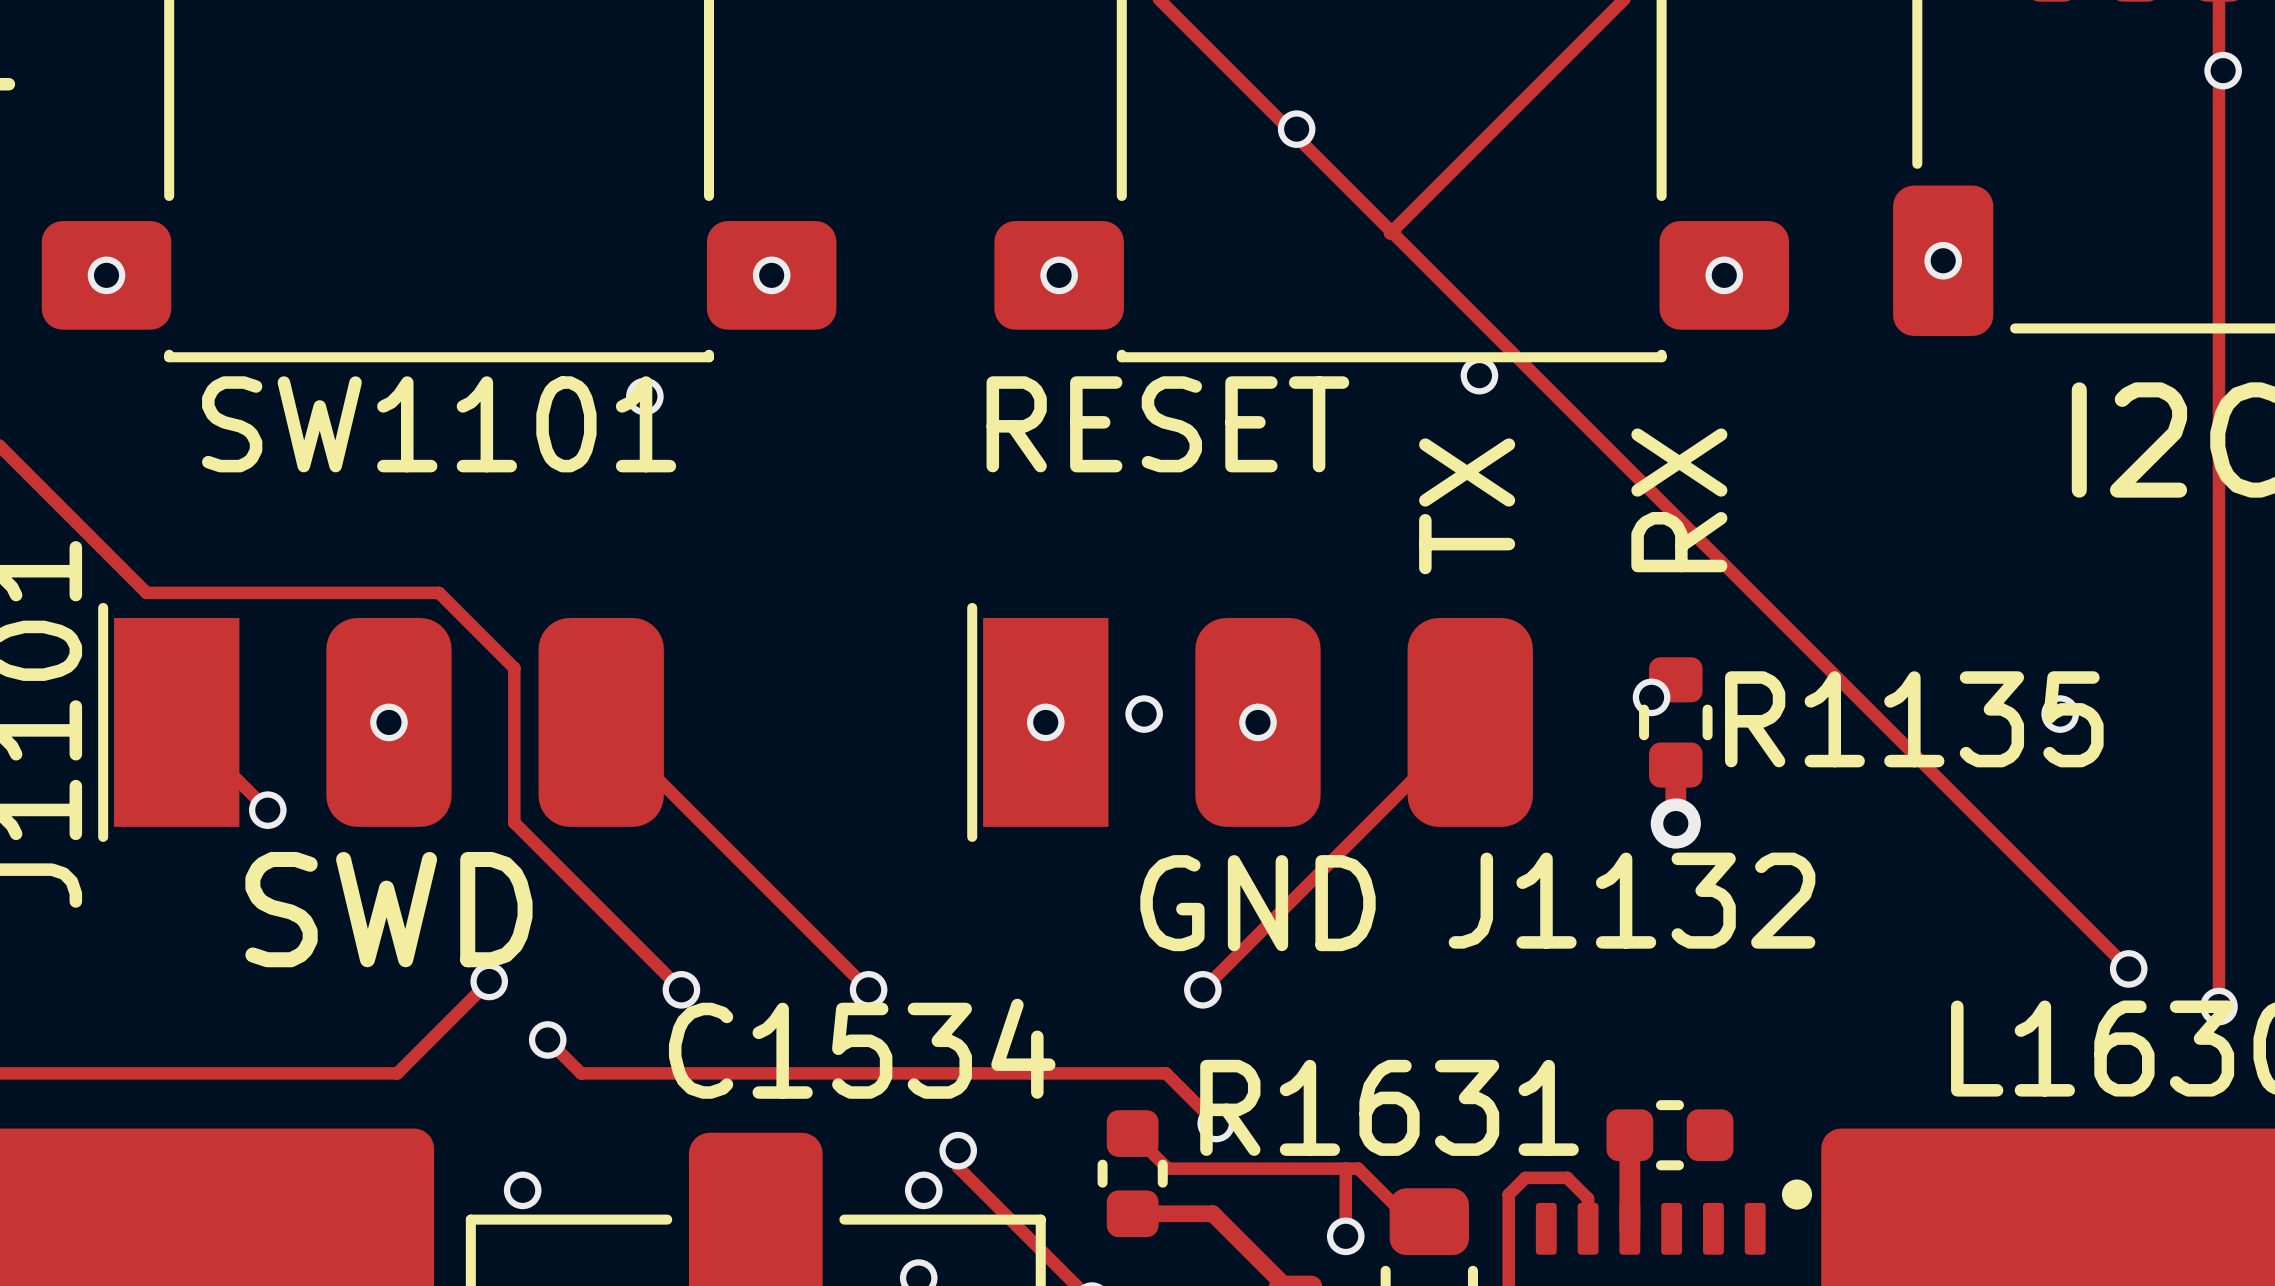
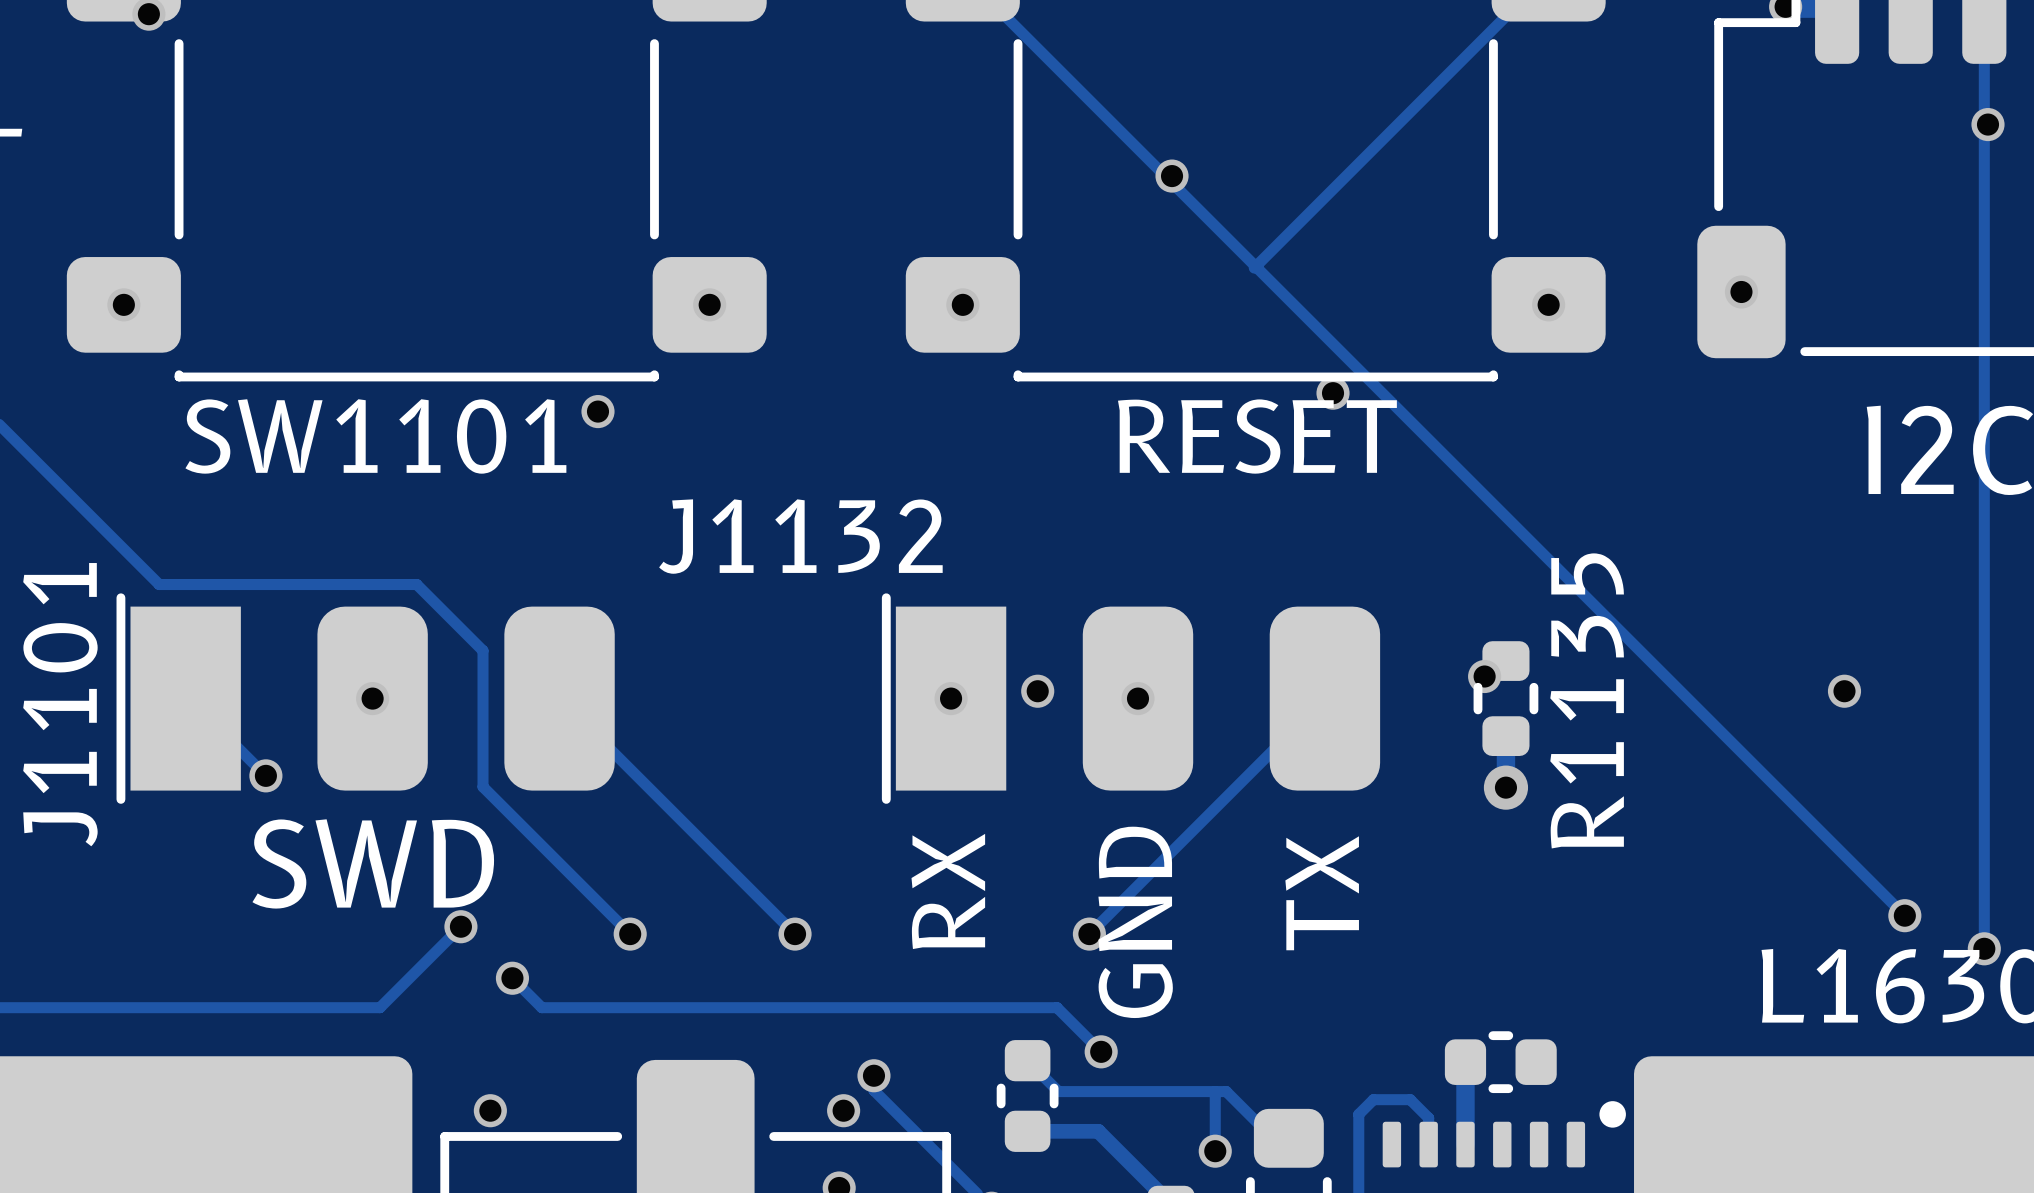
SW1101 name position: SW1101 (439, 424) -> SW1101 (375, 436)
text position: RESET (1167, 424) -> RESET (1257, 436)
text position: RX (1679, 500) -> RX (948, 891)
text position: TX (1467, 506) -> TX (1322, 893)
R1135 name rotation: 0° (1914, 719) -> 90° counterclockwise (1587, 700)
J1132 name position: J1132 (1632, 900) -> J1132 (800, 536)
text rotation: 0° (1258, 903) -> 90° counterclockwise (1135, 922)
C1534 name: C1534 (862, 1048) -> none
R1631 name: R1631 (1389, 1107) -> none

